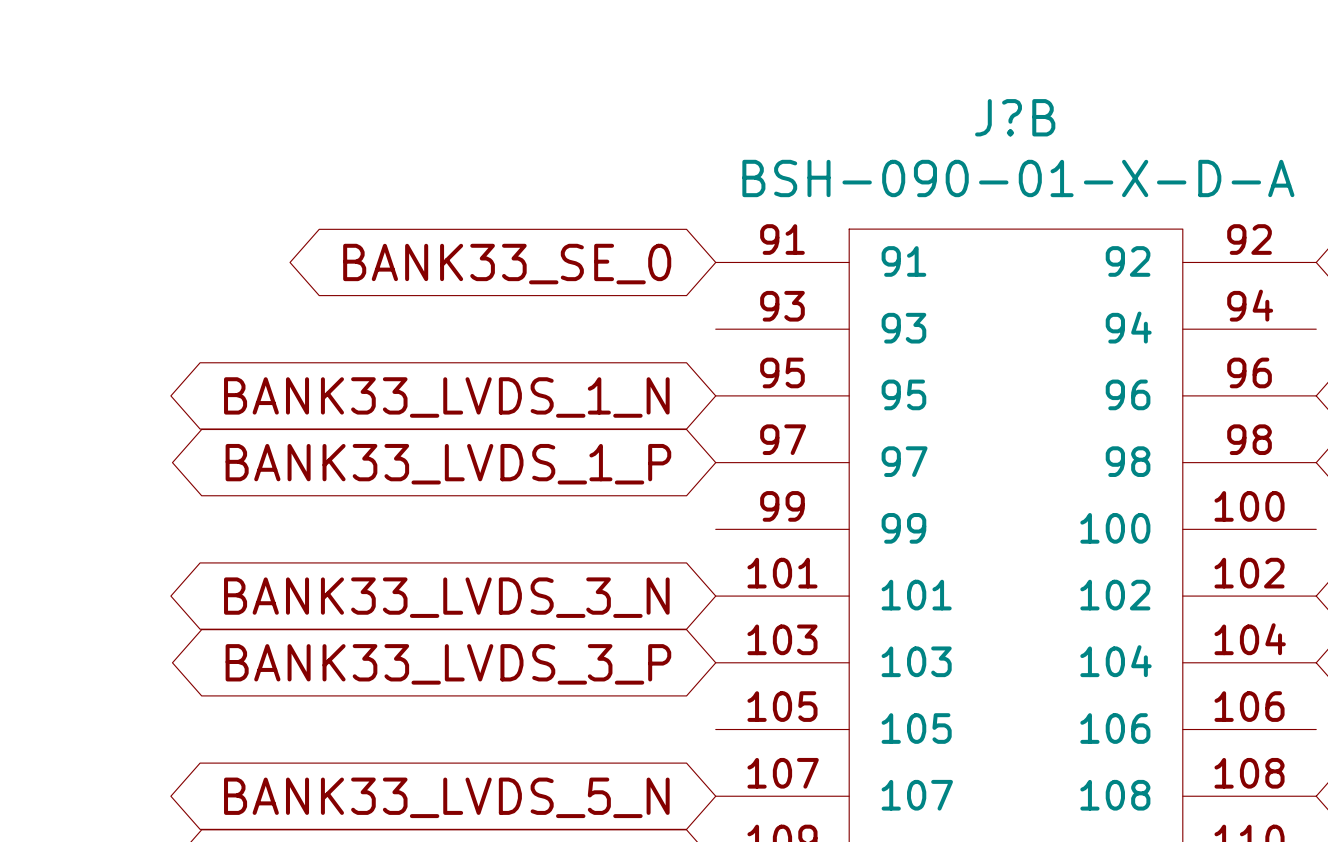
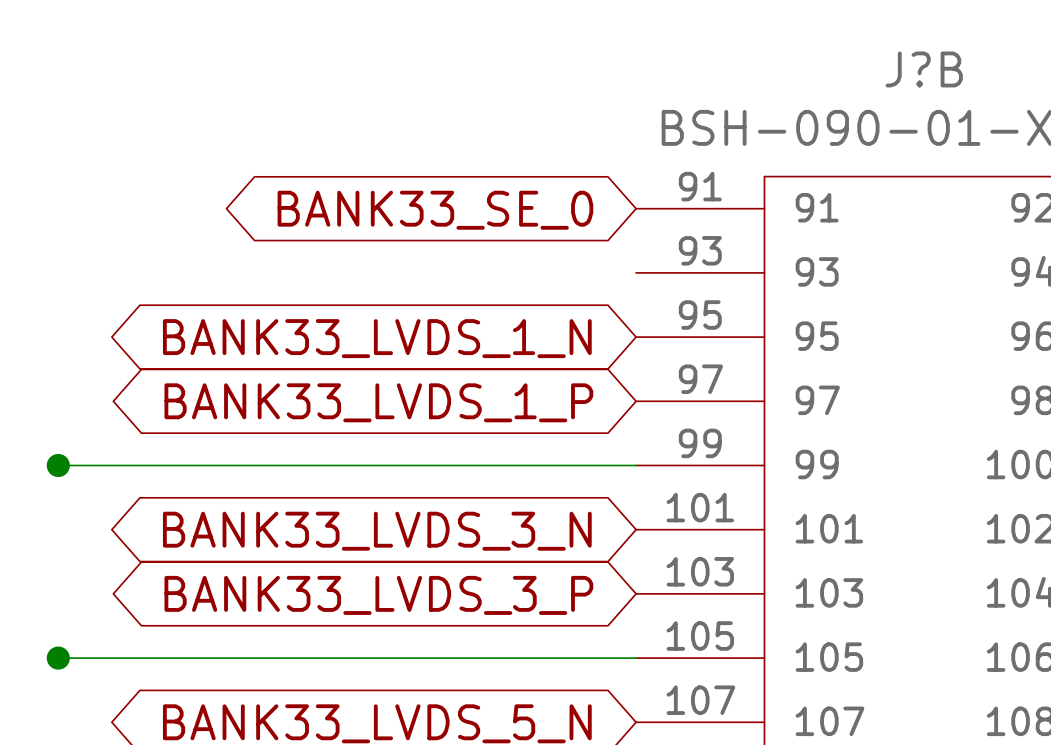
wire: none -> (58, 465) (636, 465)
junction: none -> (58, 465)
wire: none -> (58, 658) (636, 658)
junction: none -> (58, 658)

